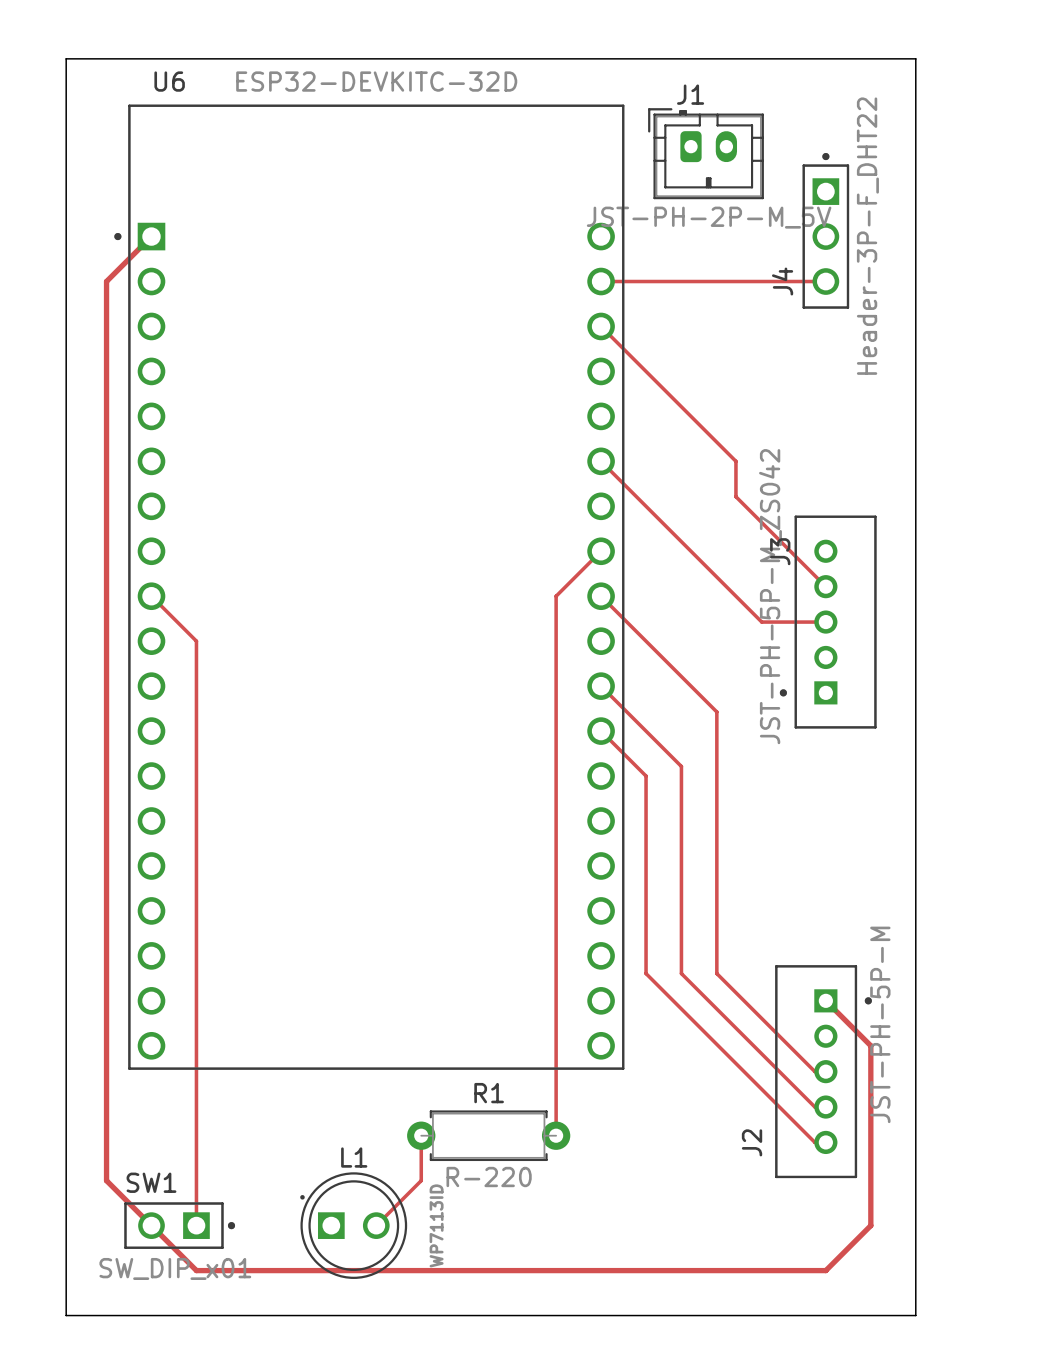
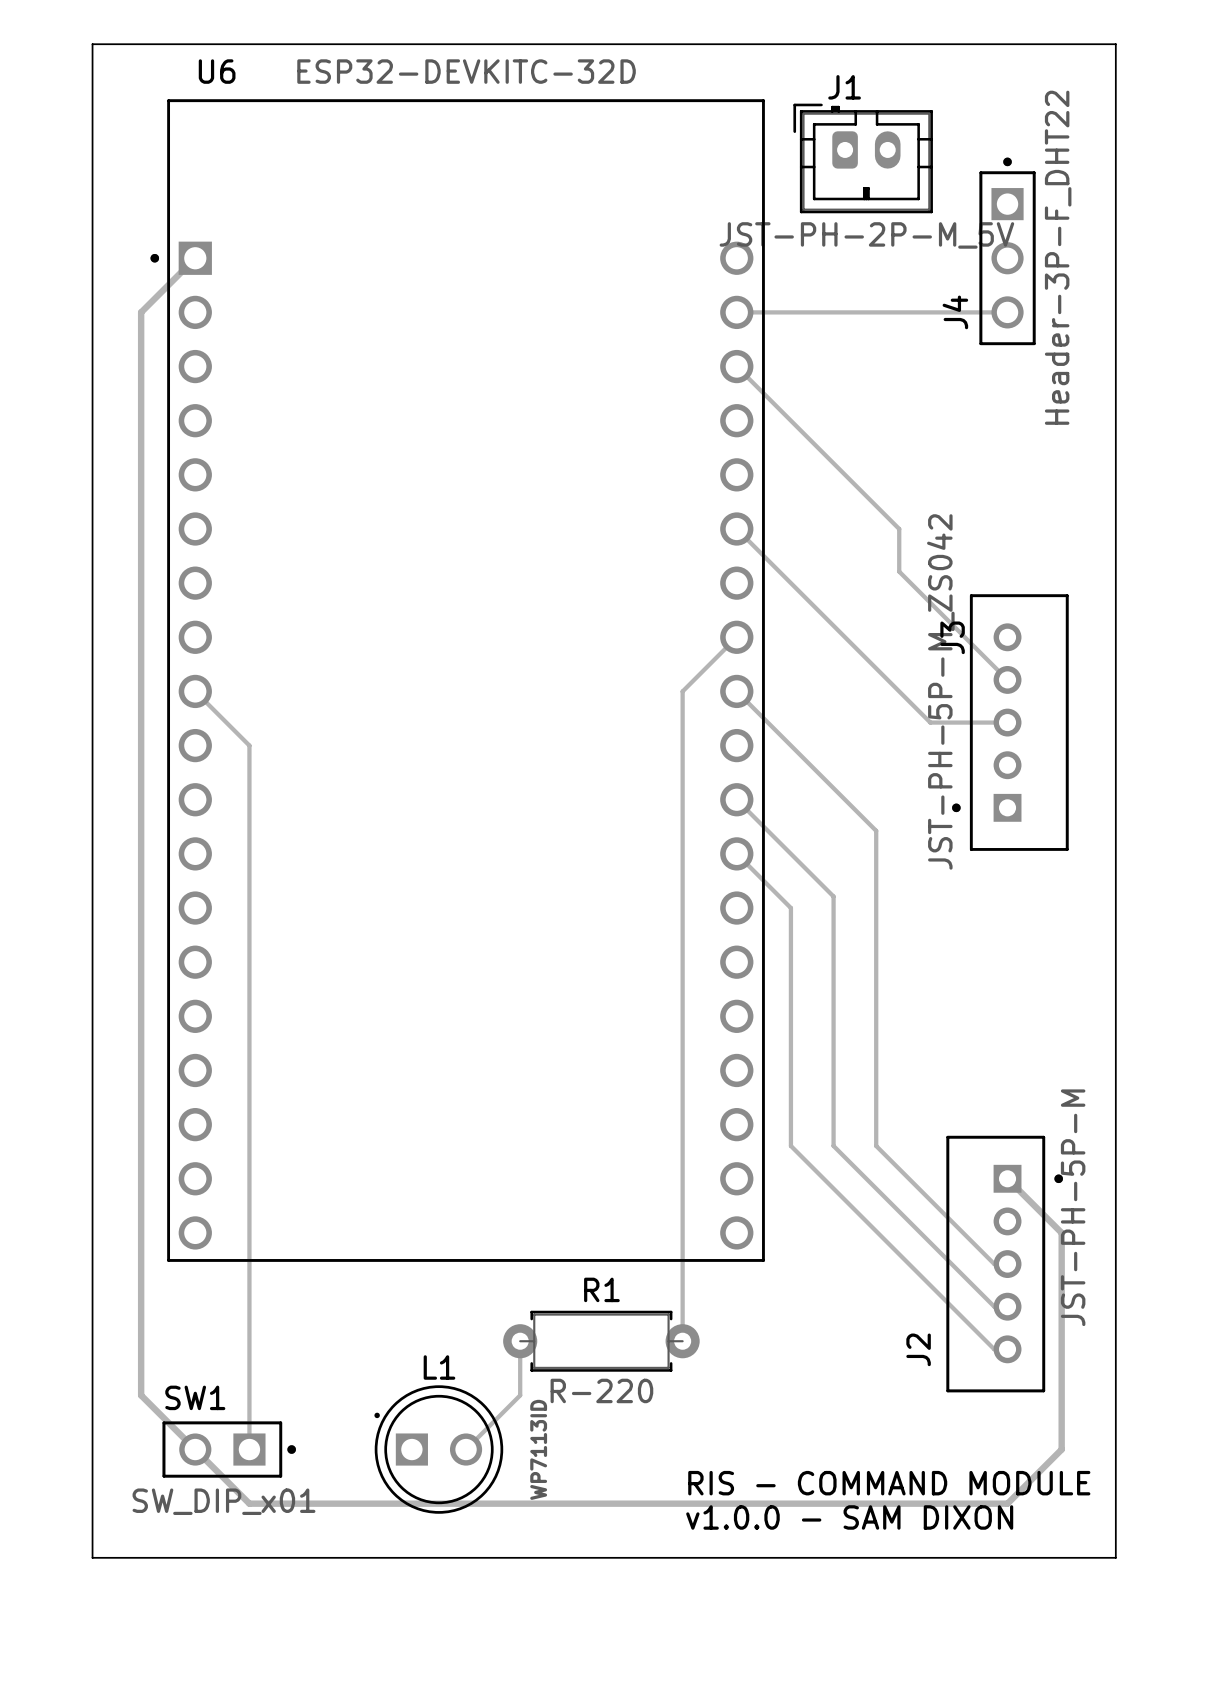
text: none -> RIS - COMMAND MODULE (889, 1483)
text: none -> v1.0.0 - SAM DIXON (849, 1517)

